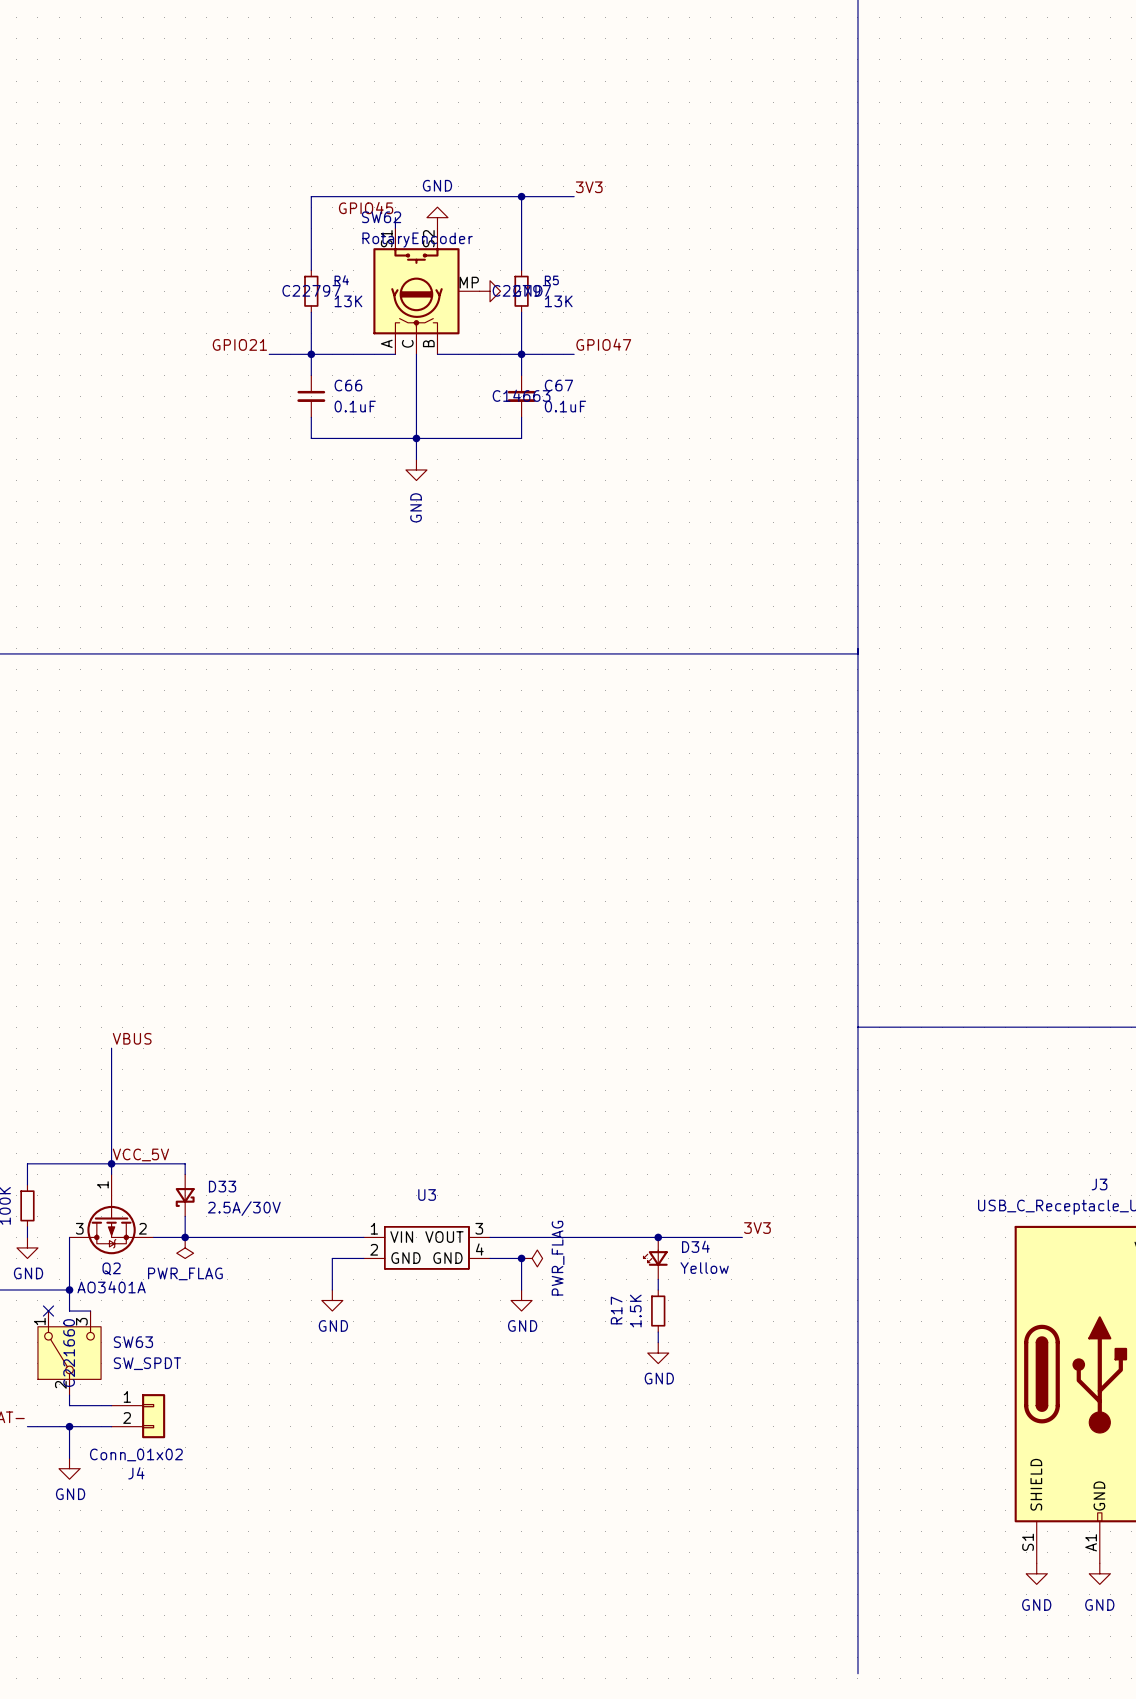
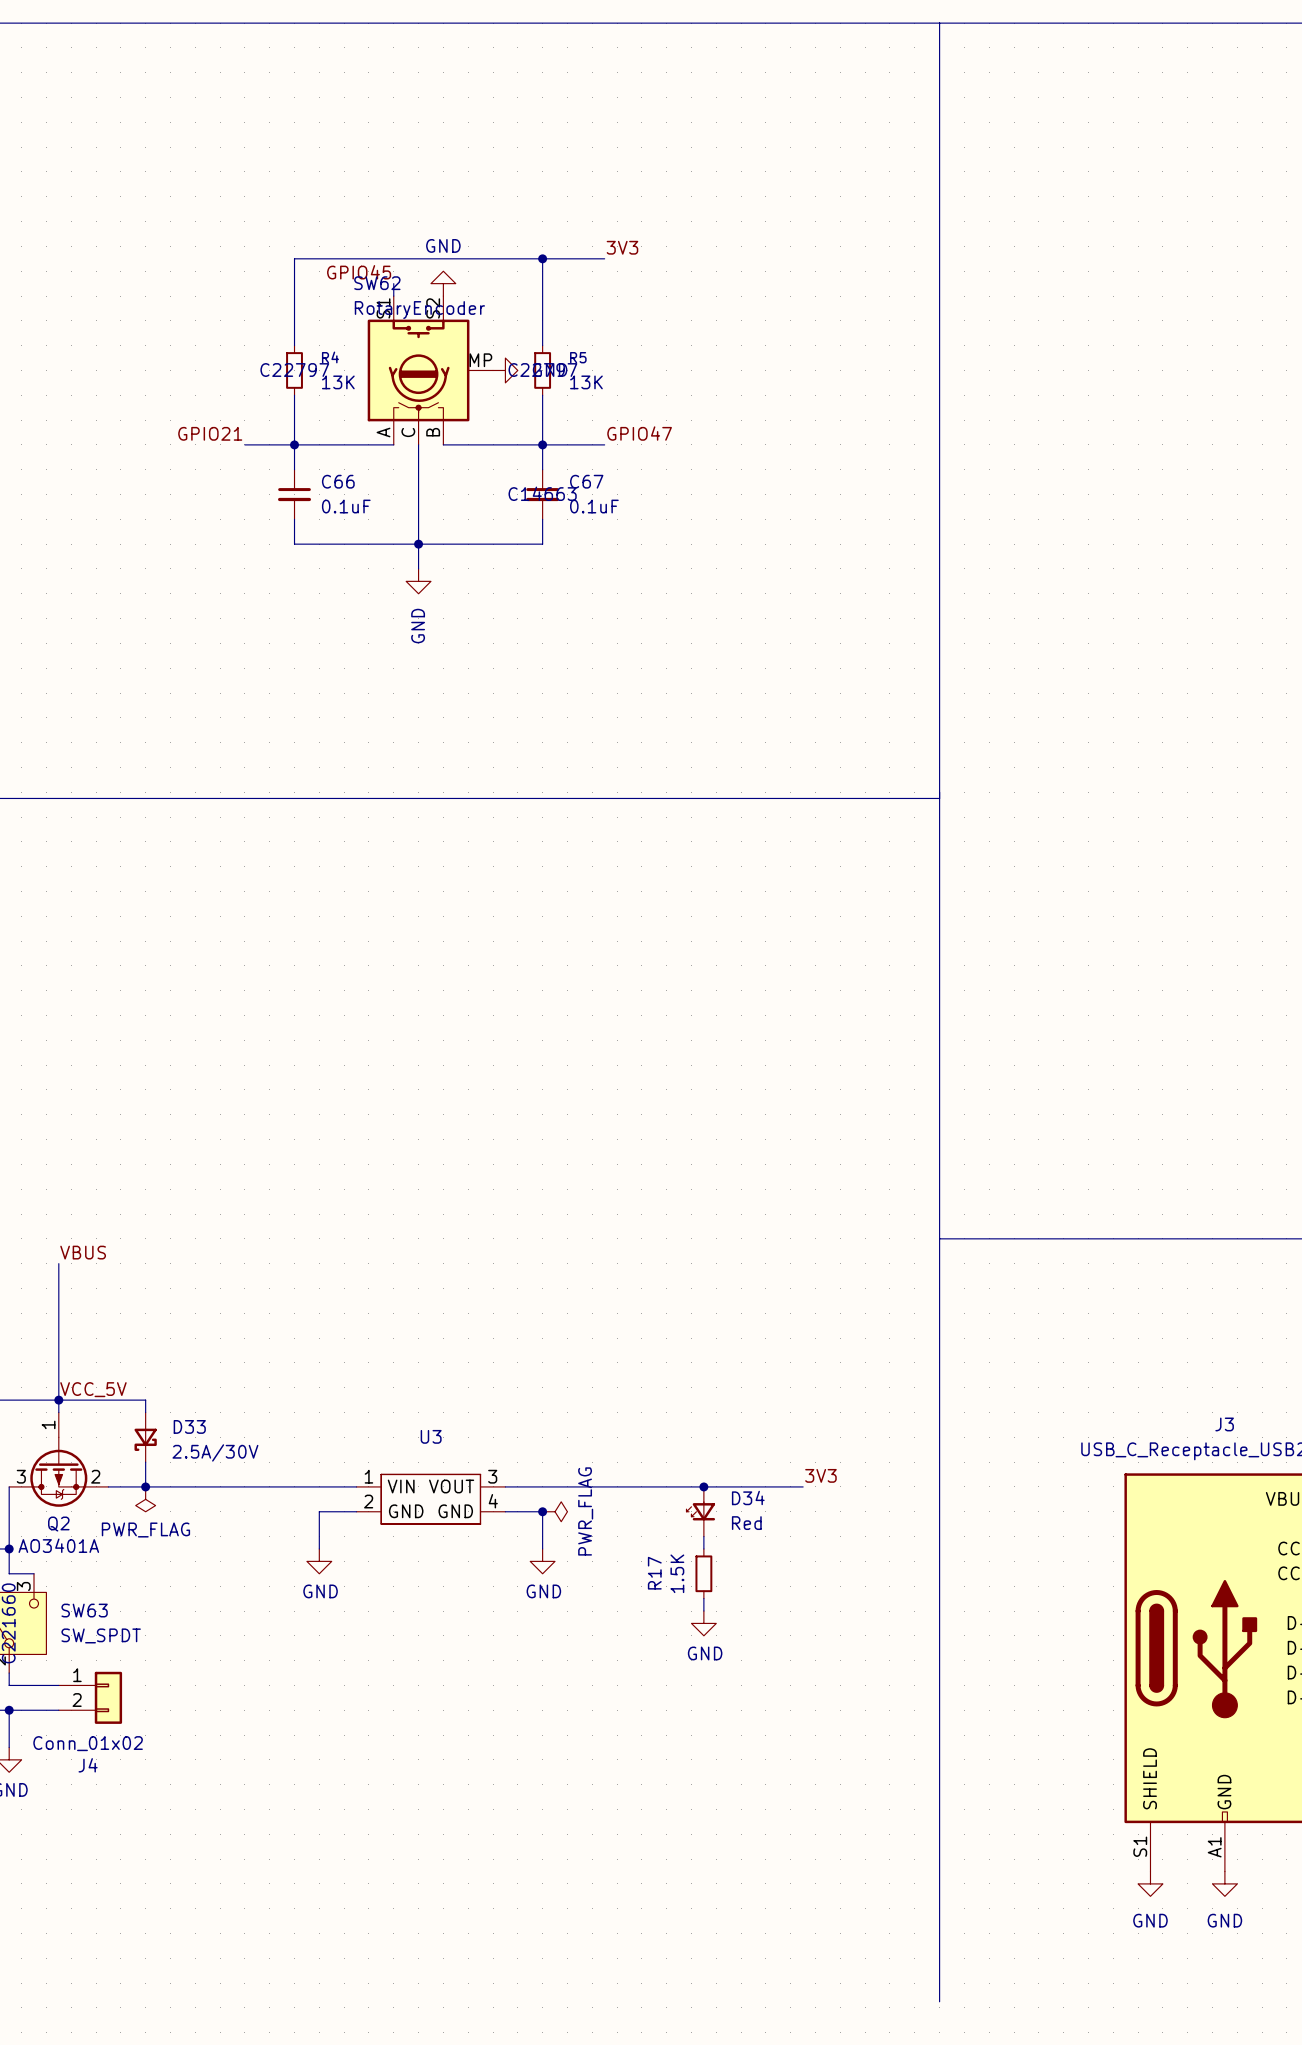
D34 value: Yellow (704, 1268) -> Red (746, 1523)

